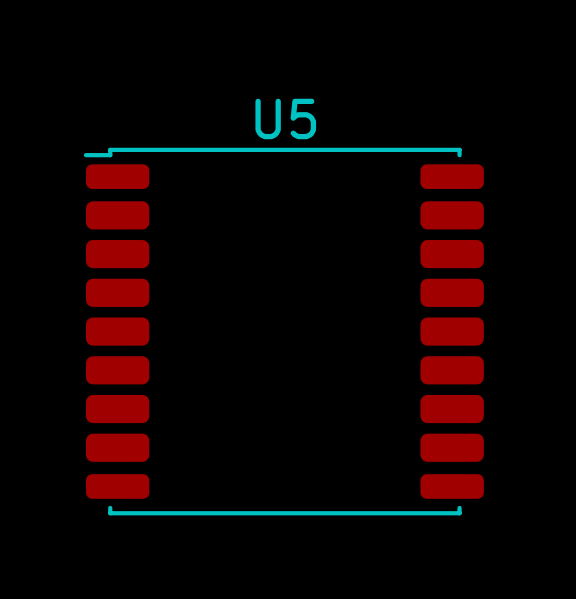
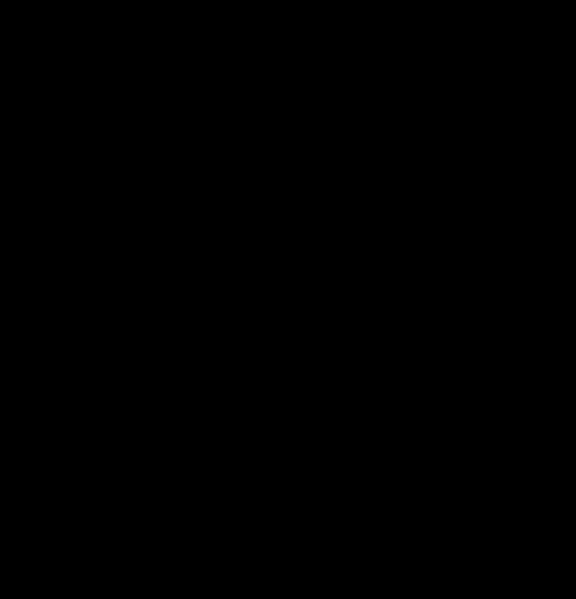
U5: (283, 331) -> none

